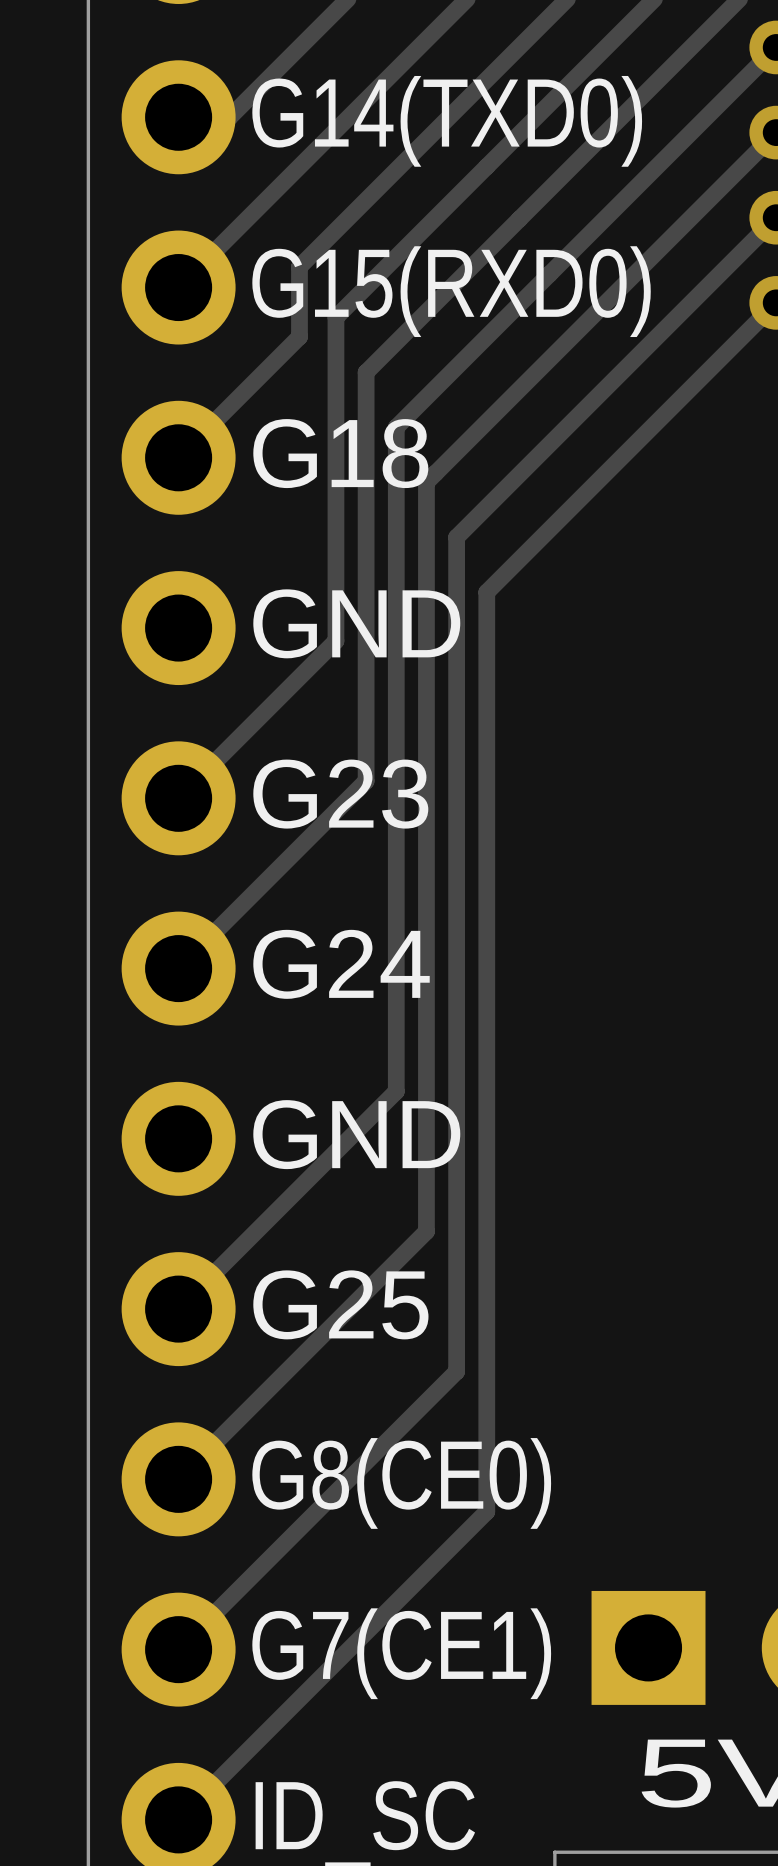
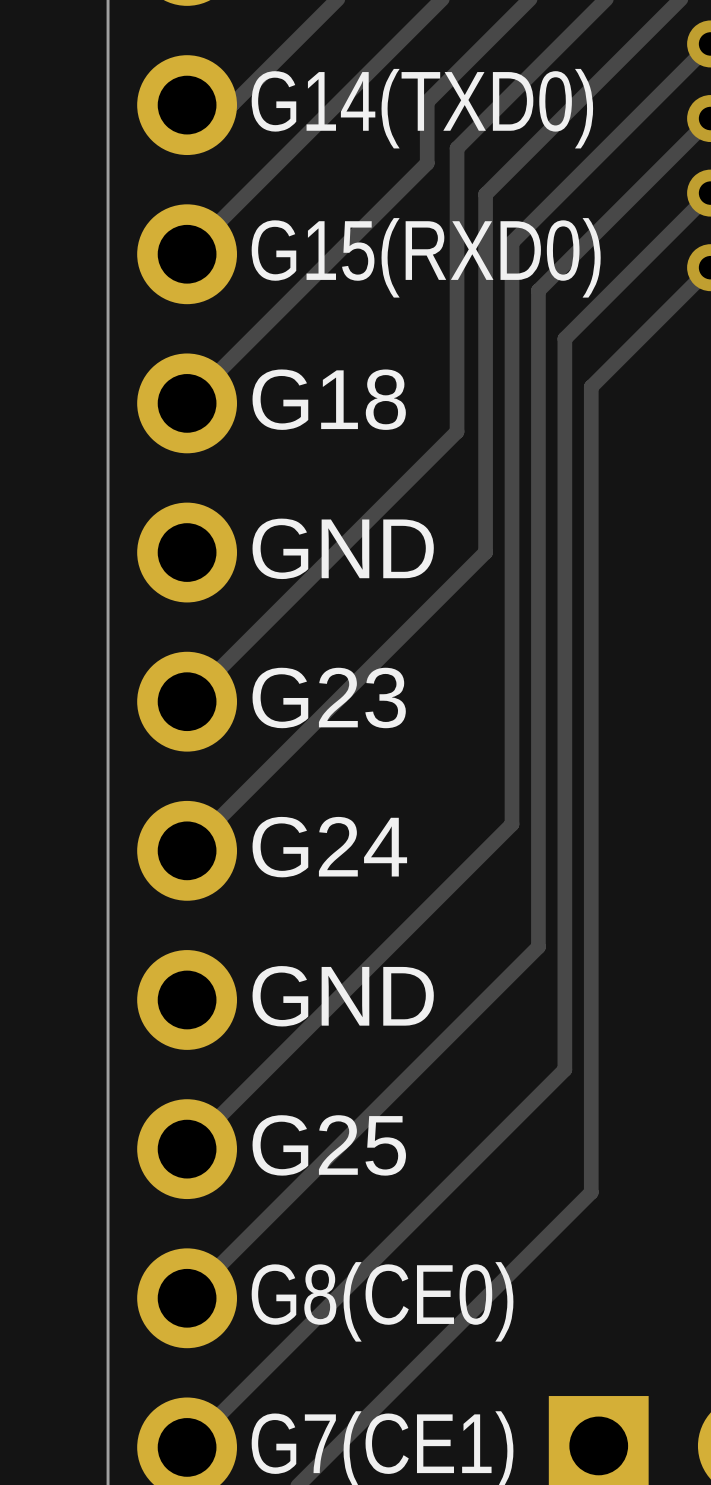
track: (452, 113) (299, 266) (299, 336) -> (427, 101) (427, 163) (292, 297)
track: (486, 166) (335, 317) (335, 640) -> (457, 148) (457, 431) (324, 563)
track: (519, 219) (366, 372) (366, 781) -> (485, 194) (485, 552) (351, 686)
track: (549, 274) (396, 427) (396, 1091) -> (512, 242) (512, 824) (377, 958)
track: (579, 329) (426, 482) (426, 1231) -> (538, 290) (538, 946) (404, 1081)
track: (609, 384) (456, 537) (456, 1371) -> (564, 338) (564, 1069) (430, 1203)
track: (640, 439) (486, 592) (486, 1511) -> (591, 386) (591, 1192) (457, 1326)

